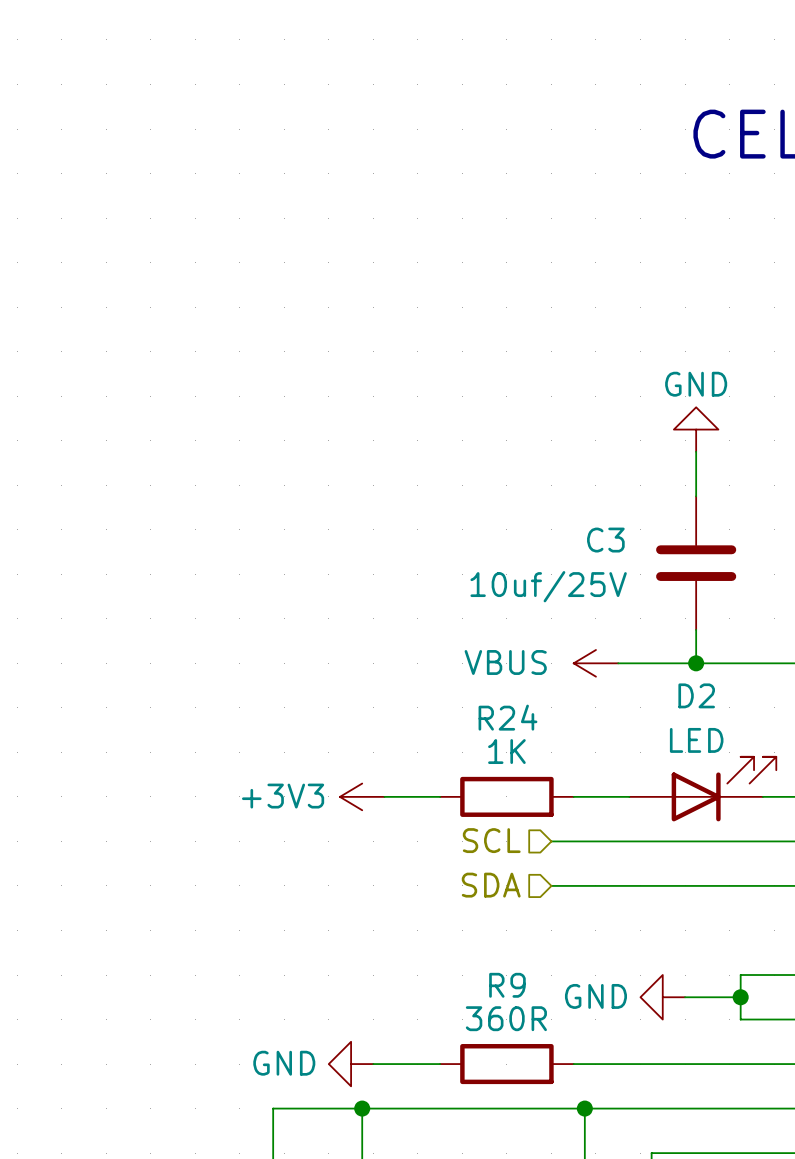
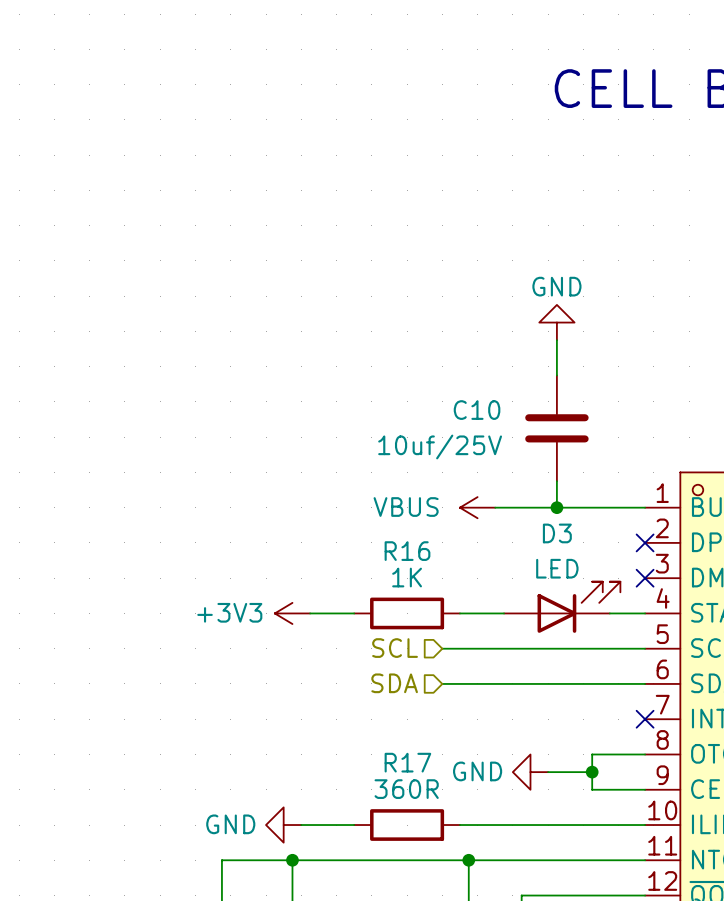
C3 name: C3 (605, 540) -> C10 (477, 410)
D2 name: D2 (696, 695) -> D3 (557, 533)
R24 name: R24 (507, 717) -> R16 (407, 551)
R9 name: R9 (507, 985) -> R17 (407, 762)

